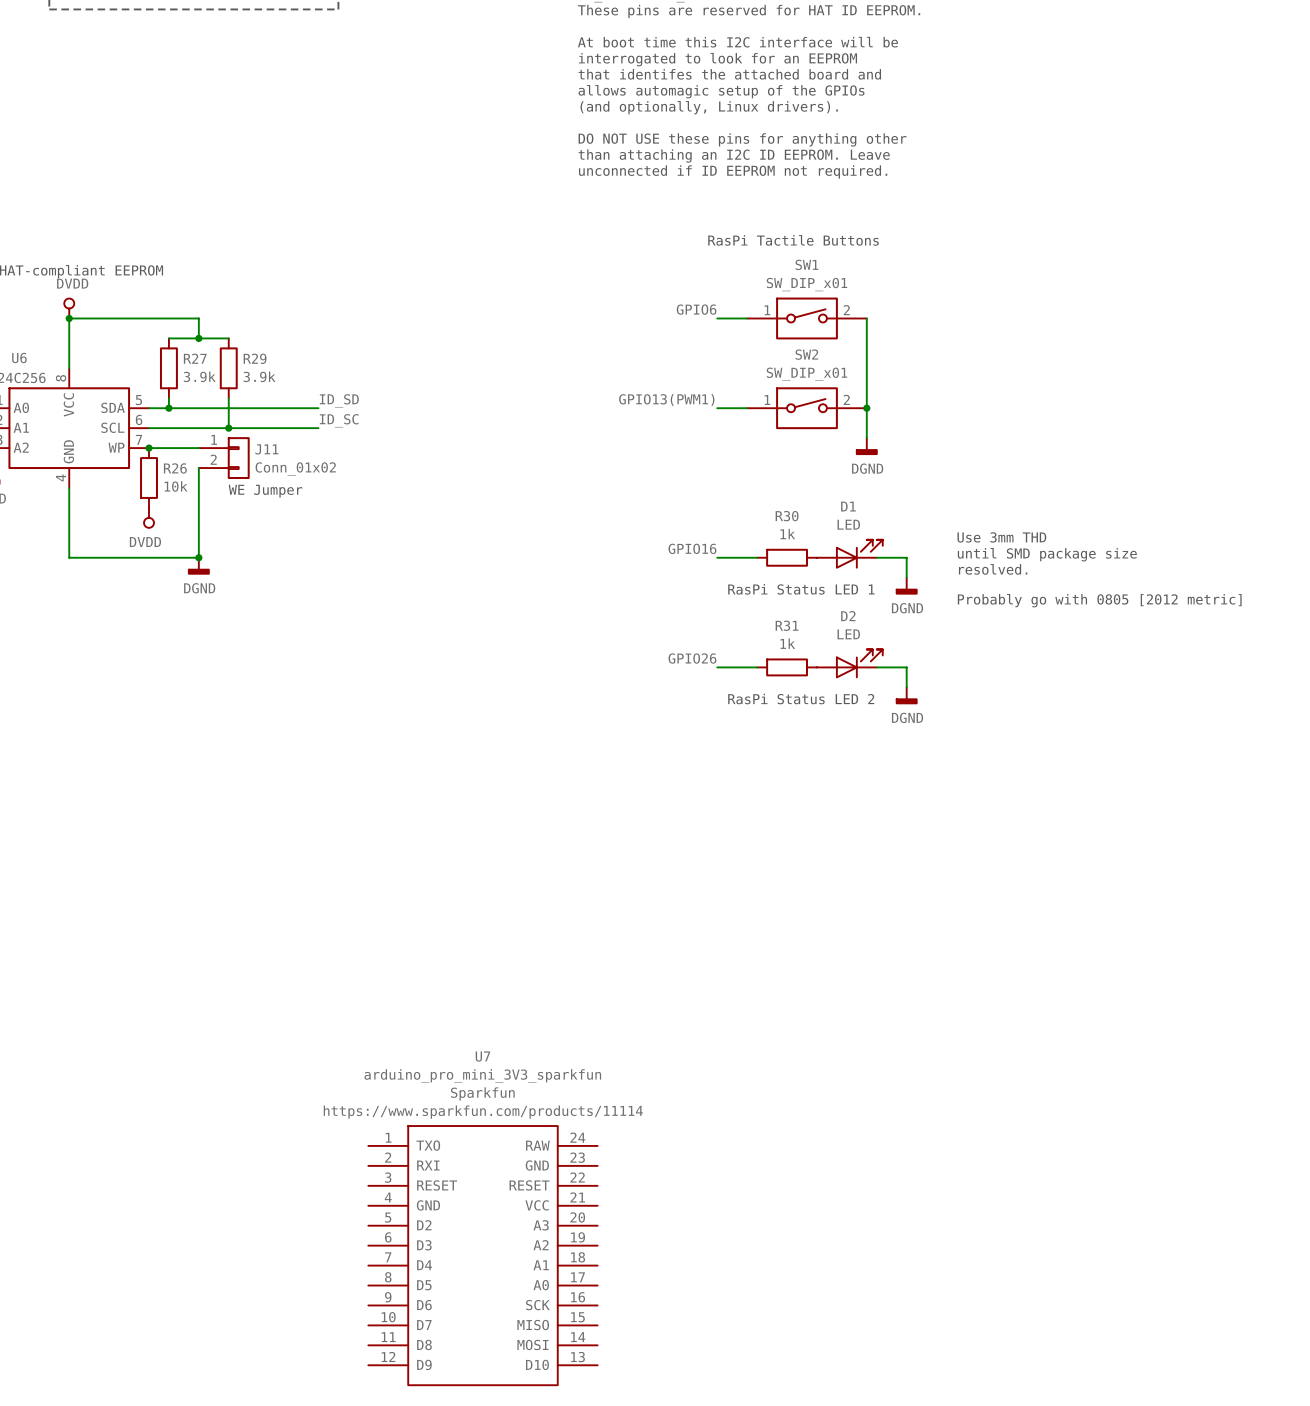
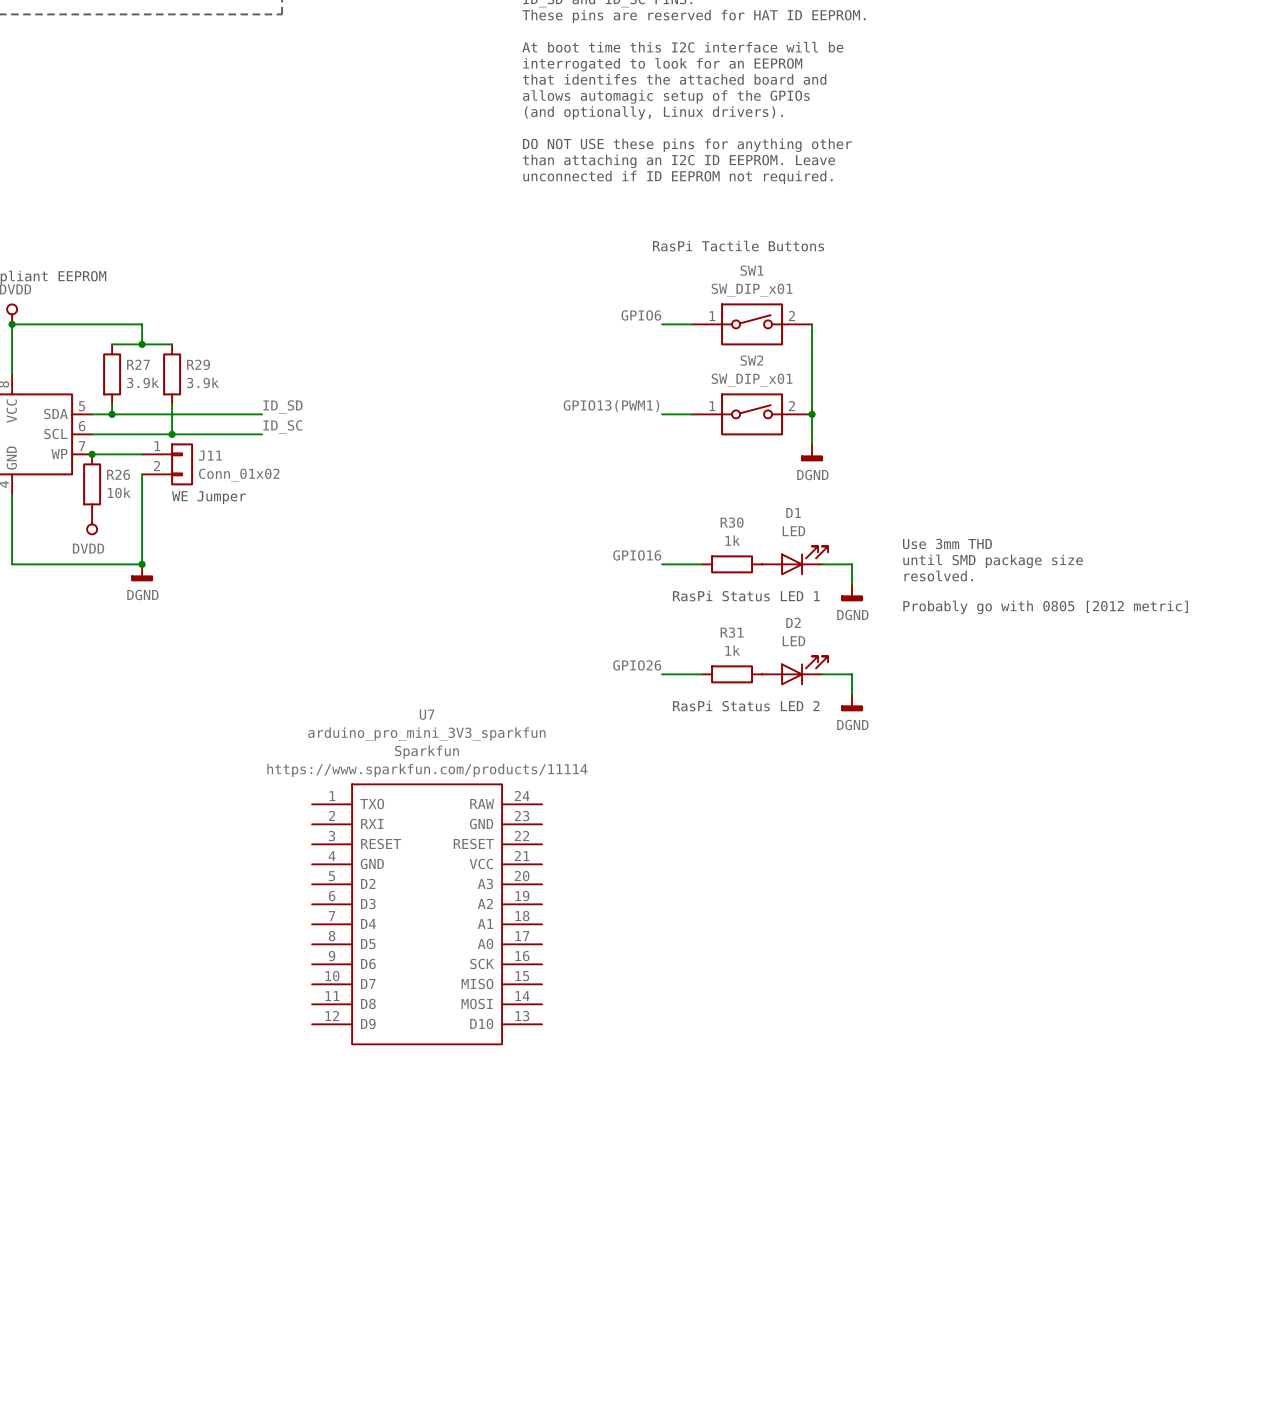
U7 position: (482, 1255) -> (427, 914)

